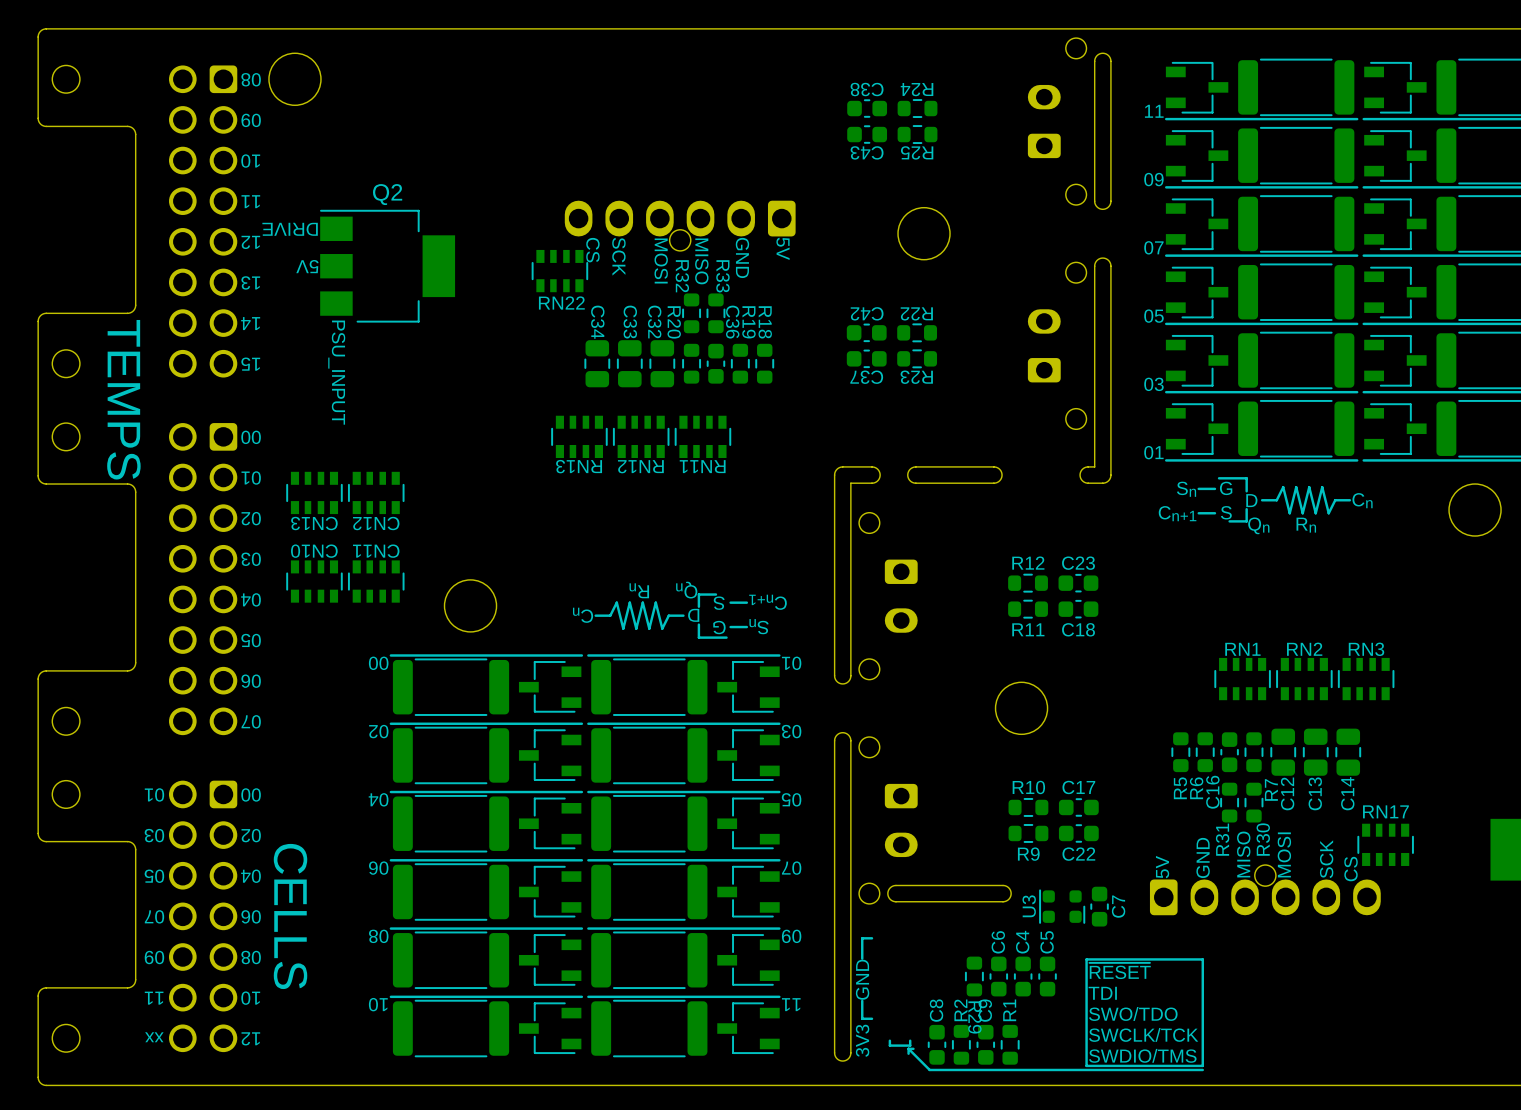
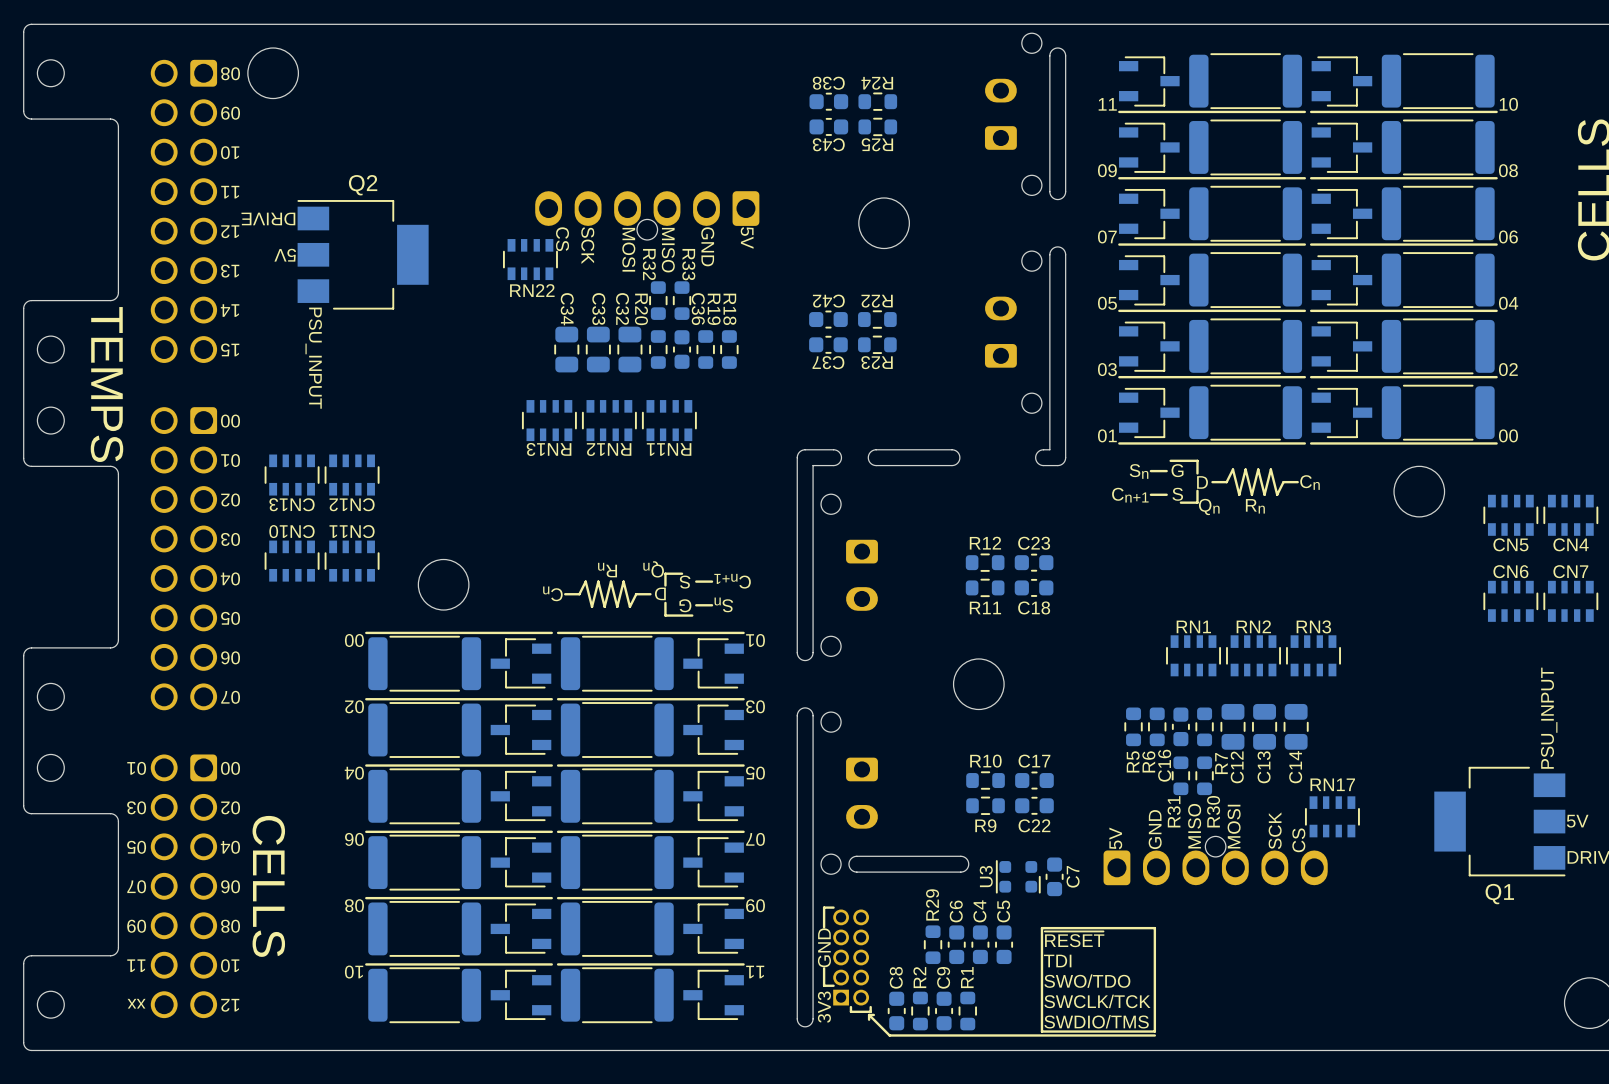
part: none -> (851, 957)
R29 name rotation: 0° (974, 1017) -> 180° (932, 904)
R29 name position: R29 (974, 1017) -> R29 (932, 904)

